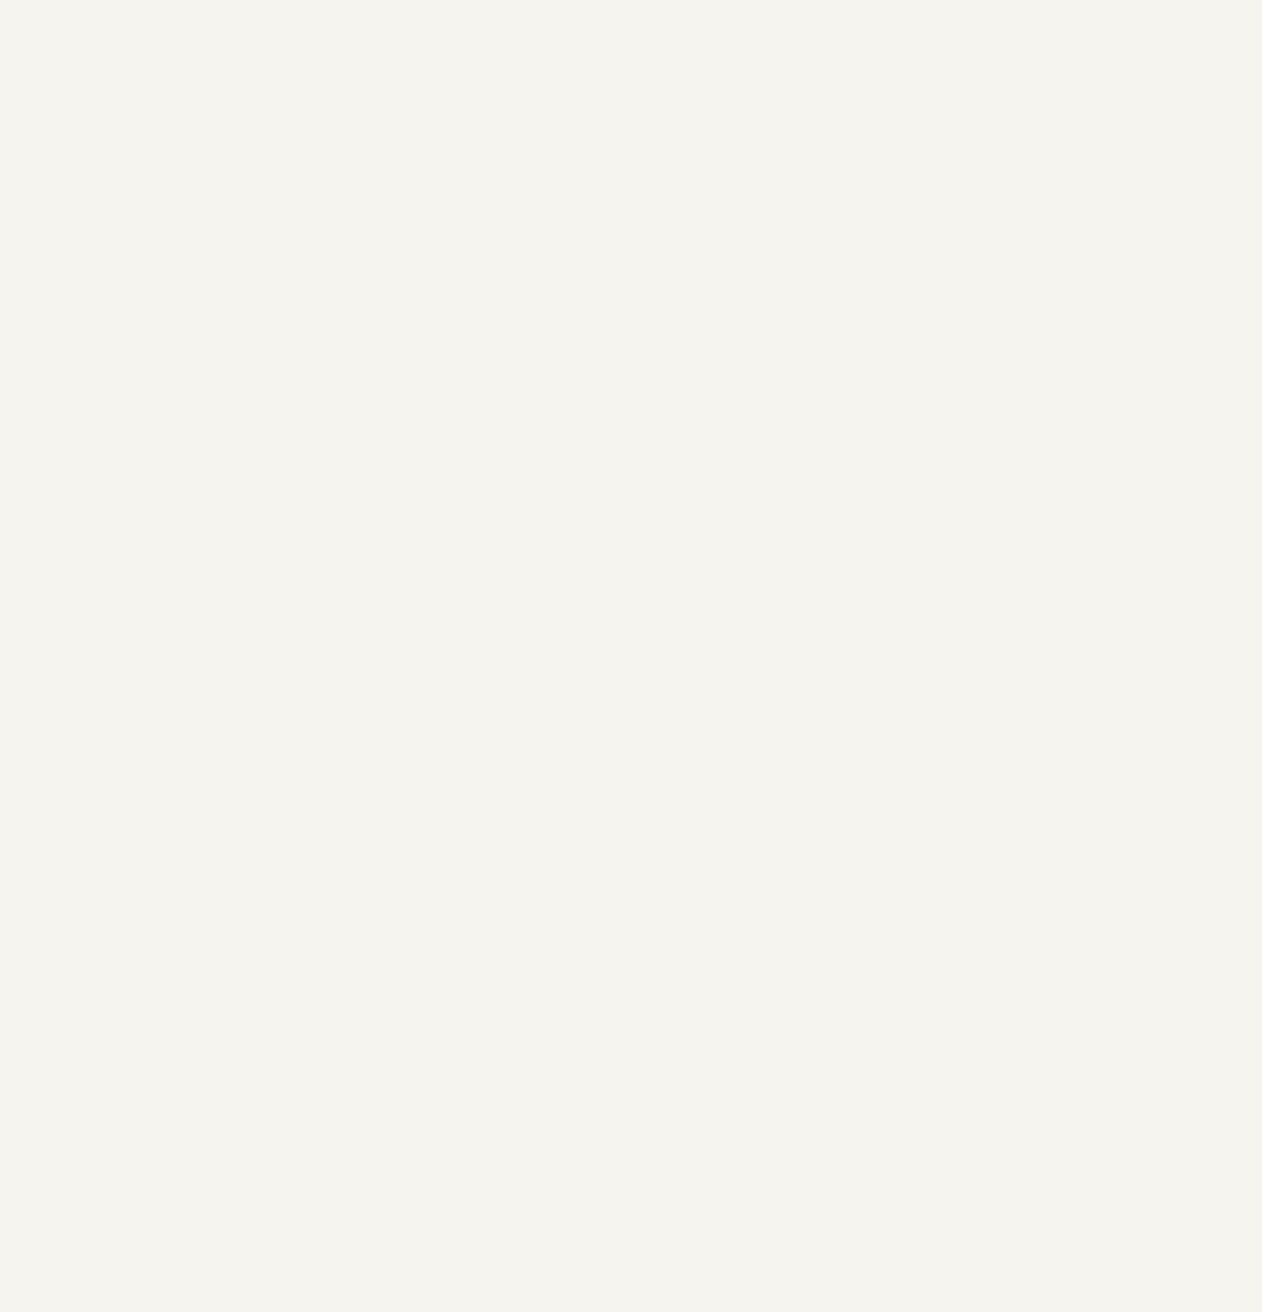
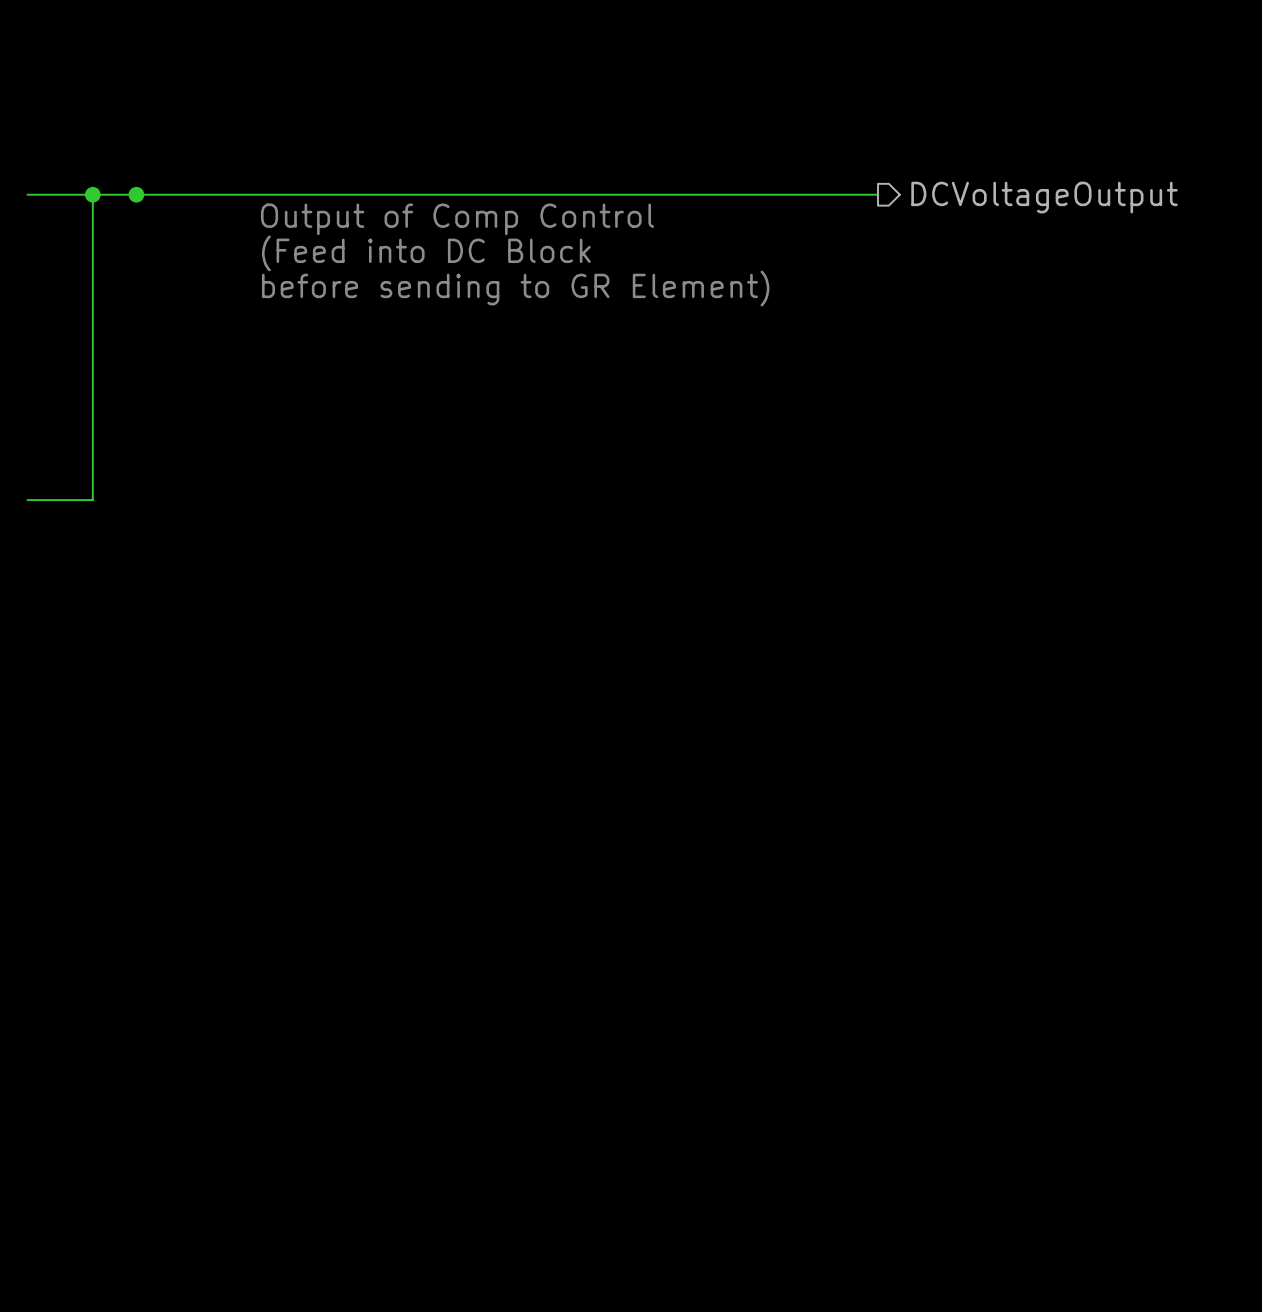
wire: none -> (27, 194) (878, 194)
wire: none -> (92, 194) (92, 500) (27, 500)
junction: none -> (92, 194)
junction: none -> (136, 194)
hierarchical label: none -> DCVoltageOutput (1044, 197)
text: none -> Output of Comp Control (457, 219)
text: none -> (Feed into DC Block (426, 253)
text: none -> before sending to GR Element) (515, 288)

